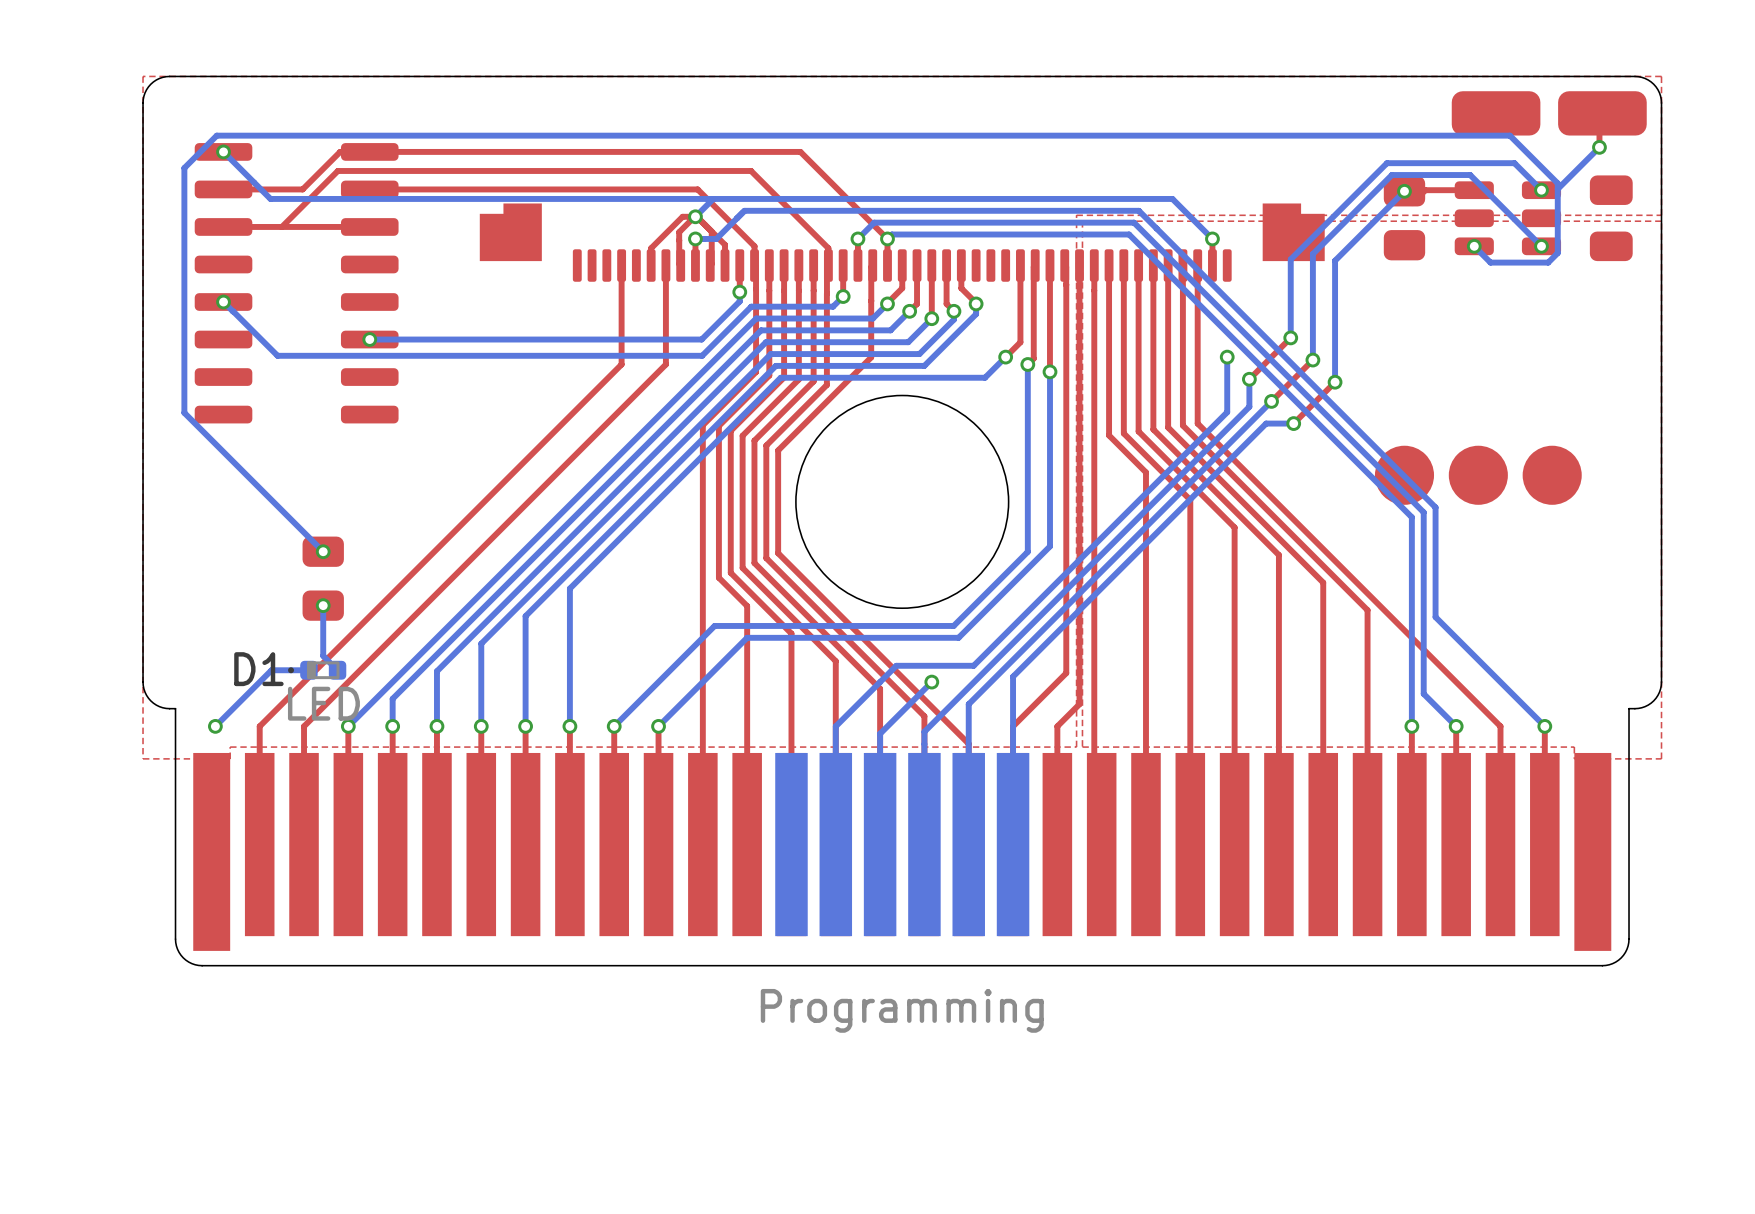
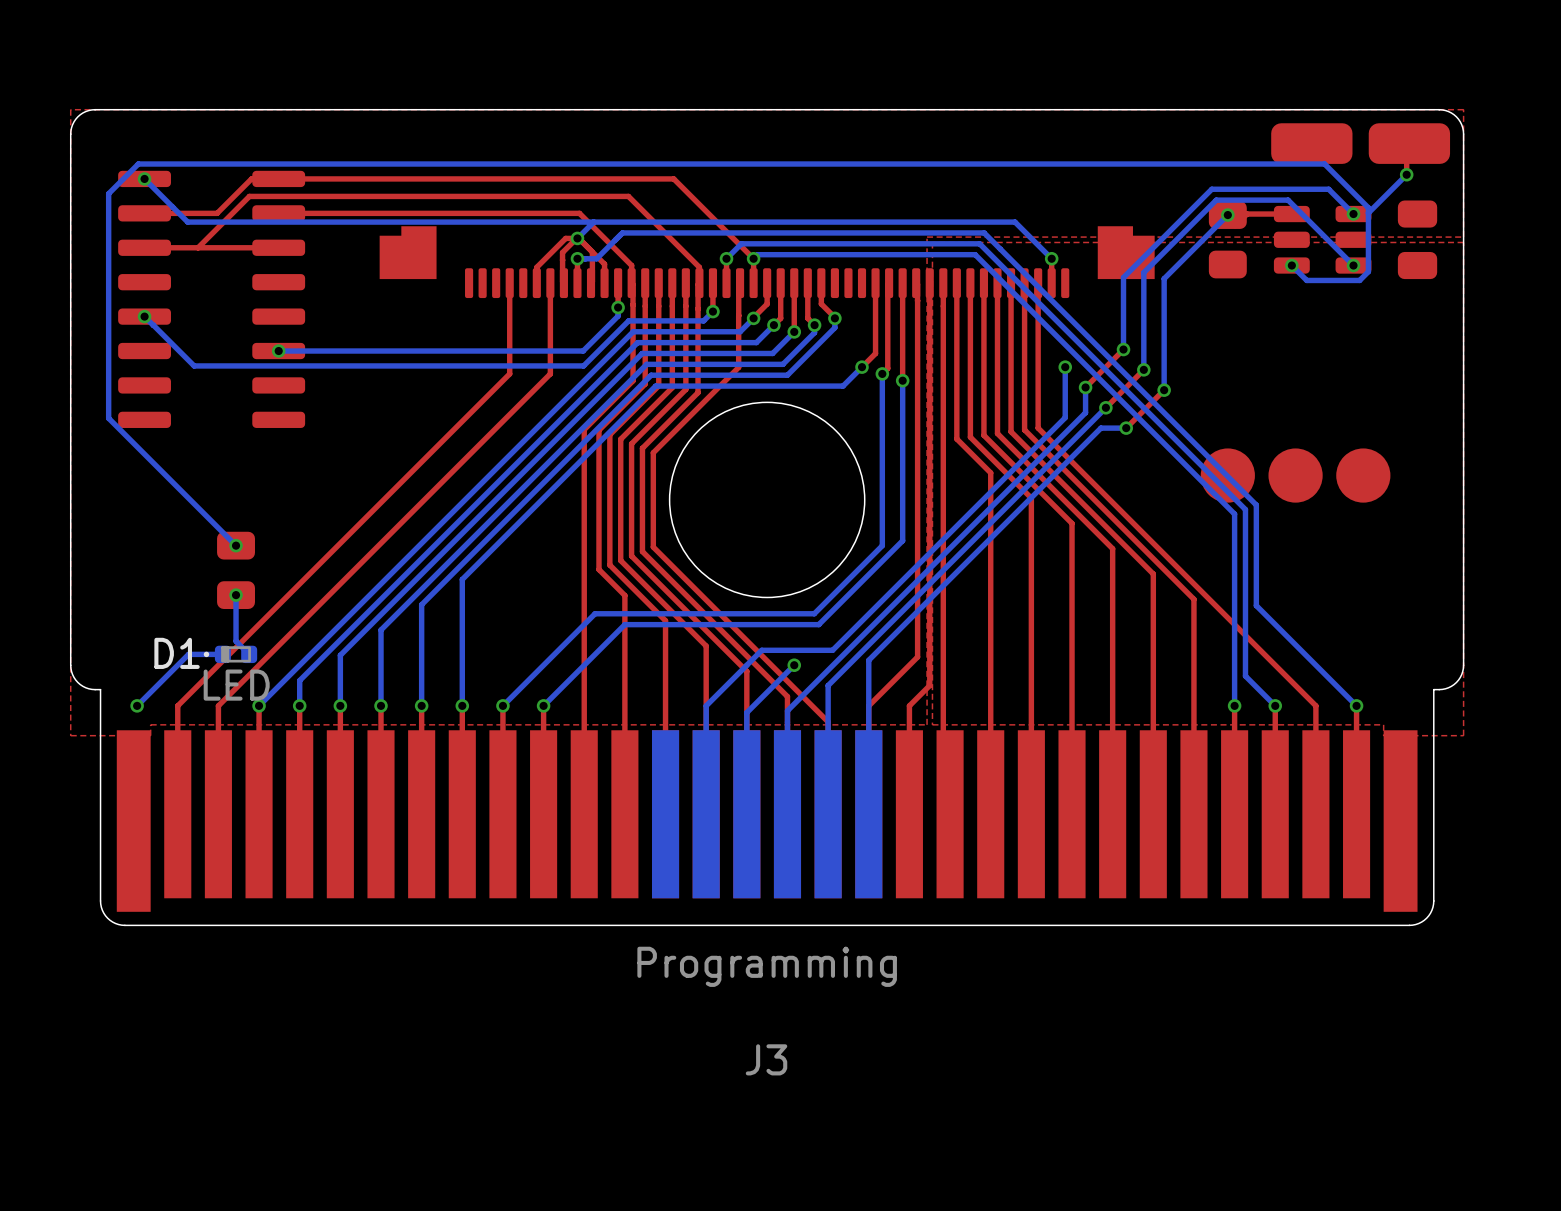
part: Programming (902, 844) -> none
J3: none -> Programming (767, 814)

